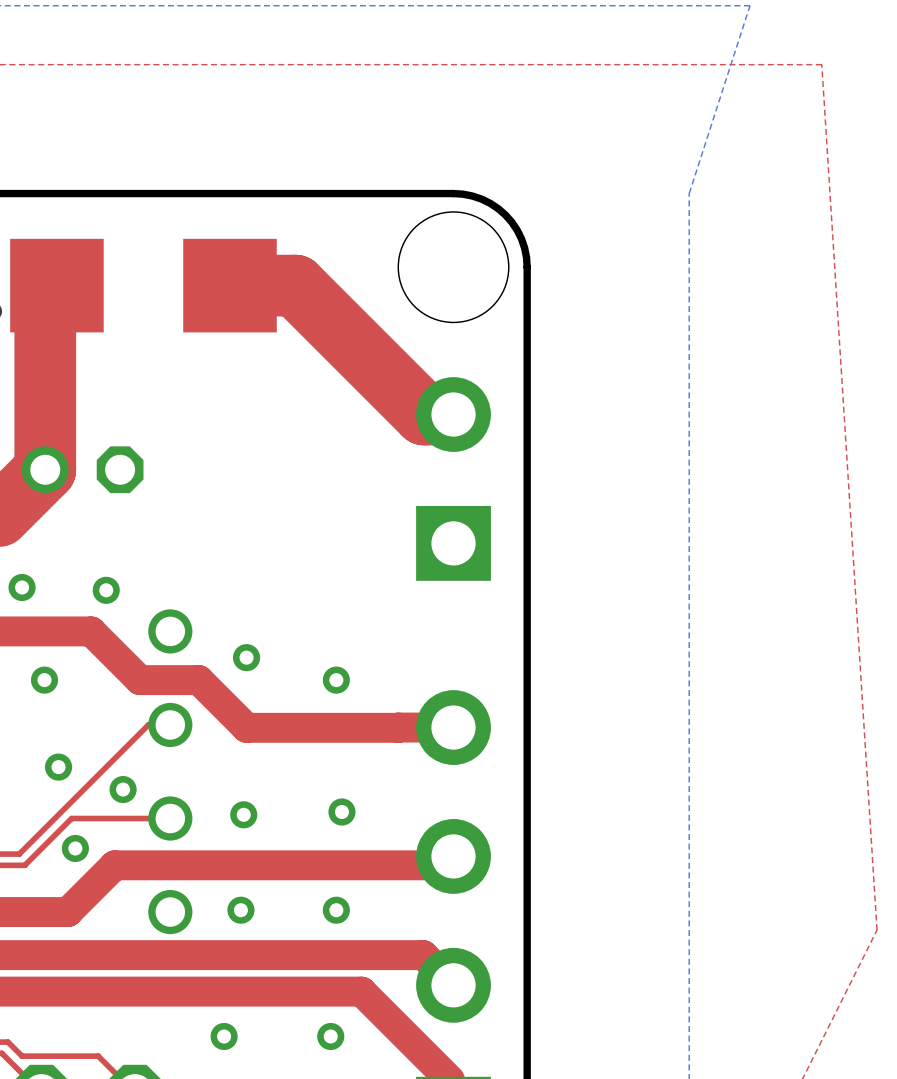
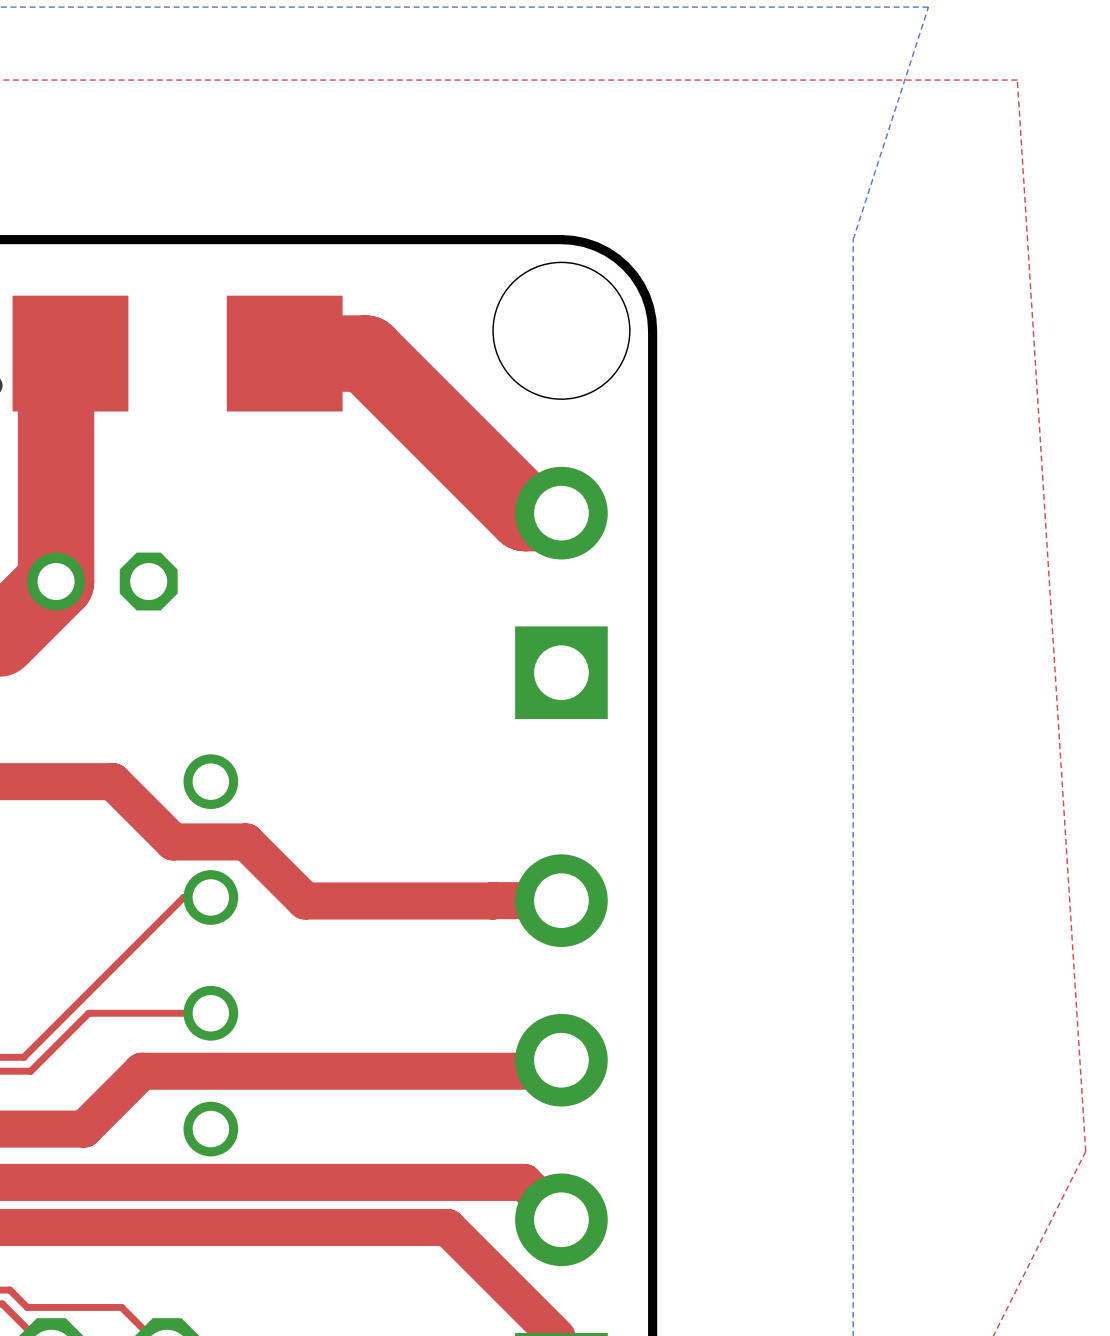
via: (22, 587) -> none
via: (106, 590) -> none
via: (246, 657) -> none
via: (44, 680) -> none
via: (336, 680) -> none
via: (58, 767) -> none
via: (123, 789) -> none
via: (341, 812) -> none
via: (243, 814) -> none
via: (75, 848) -> none
via: (240, 910) -> none
via: (336, 910) -> none
via: (224, 1036) -> none
via: (330, 1036) -> none

